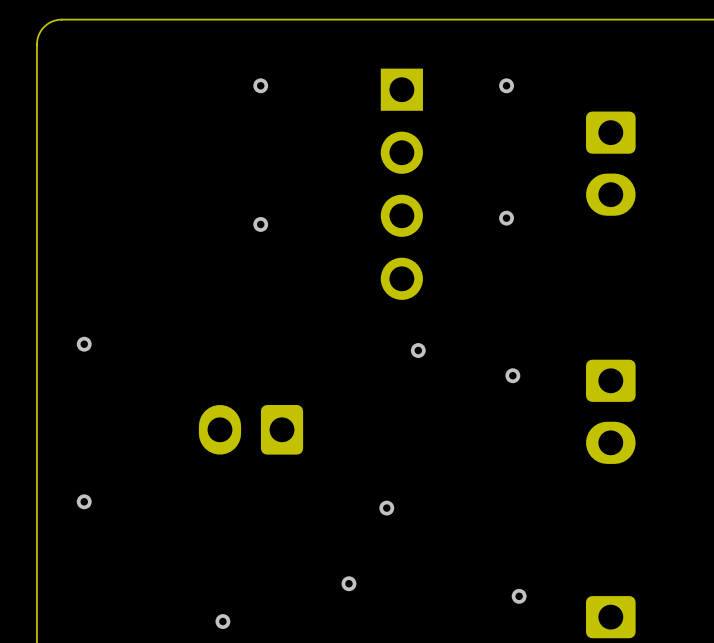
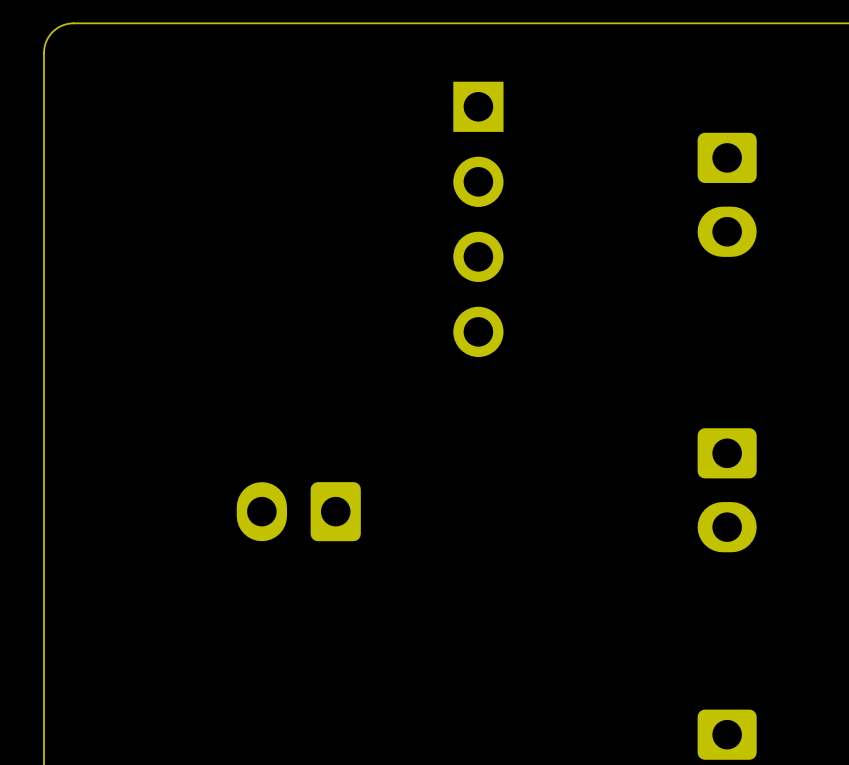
via: (260, 85) -> none
via: (506, 85) -> none
via: (506, 218) -> none
via: (260, 224) -> none
via: (84, 344) -> none
via: (418, 350) -> none
via: (512, 375) -> none
via: (84, 501) -> none
via: (386, 508) -> none
via: (348, 583) -> none
via: (519, 596) -> none
via: (222, 621) -> none

